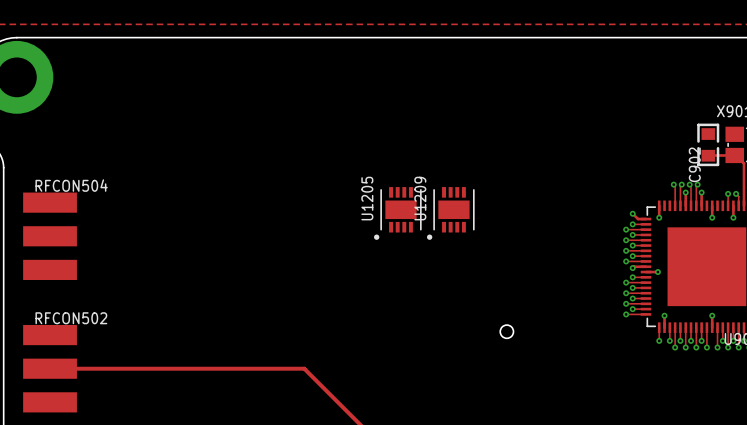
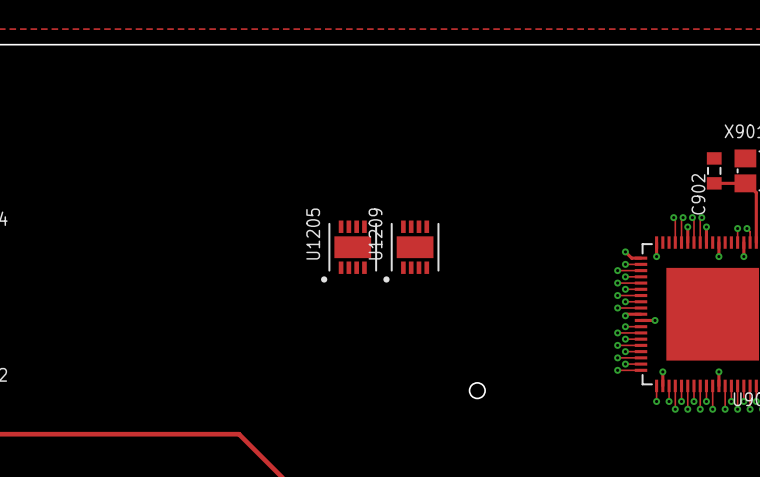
C902 footprint: [697, 123, 720, 167] -> [706, 152, 722, 190]

